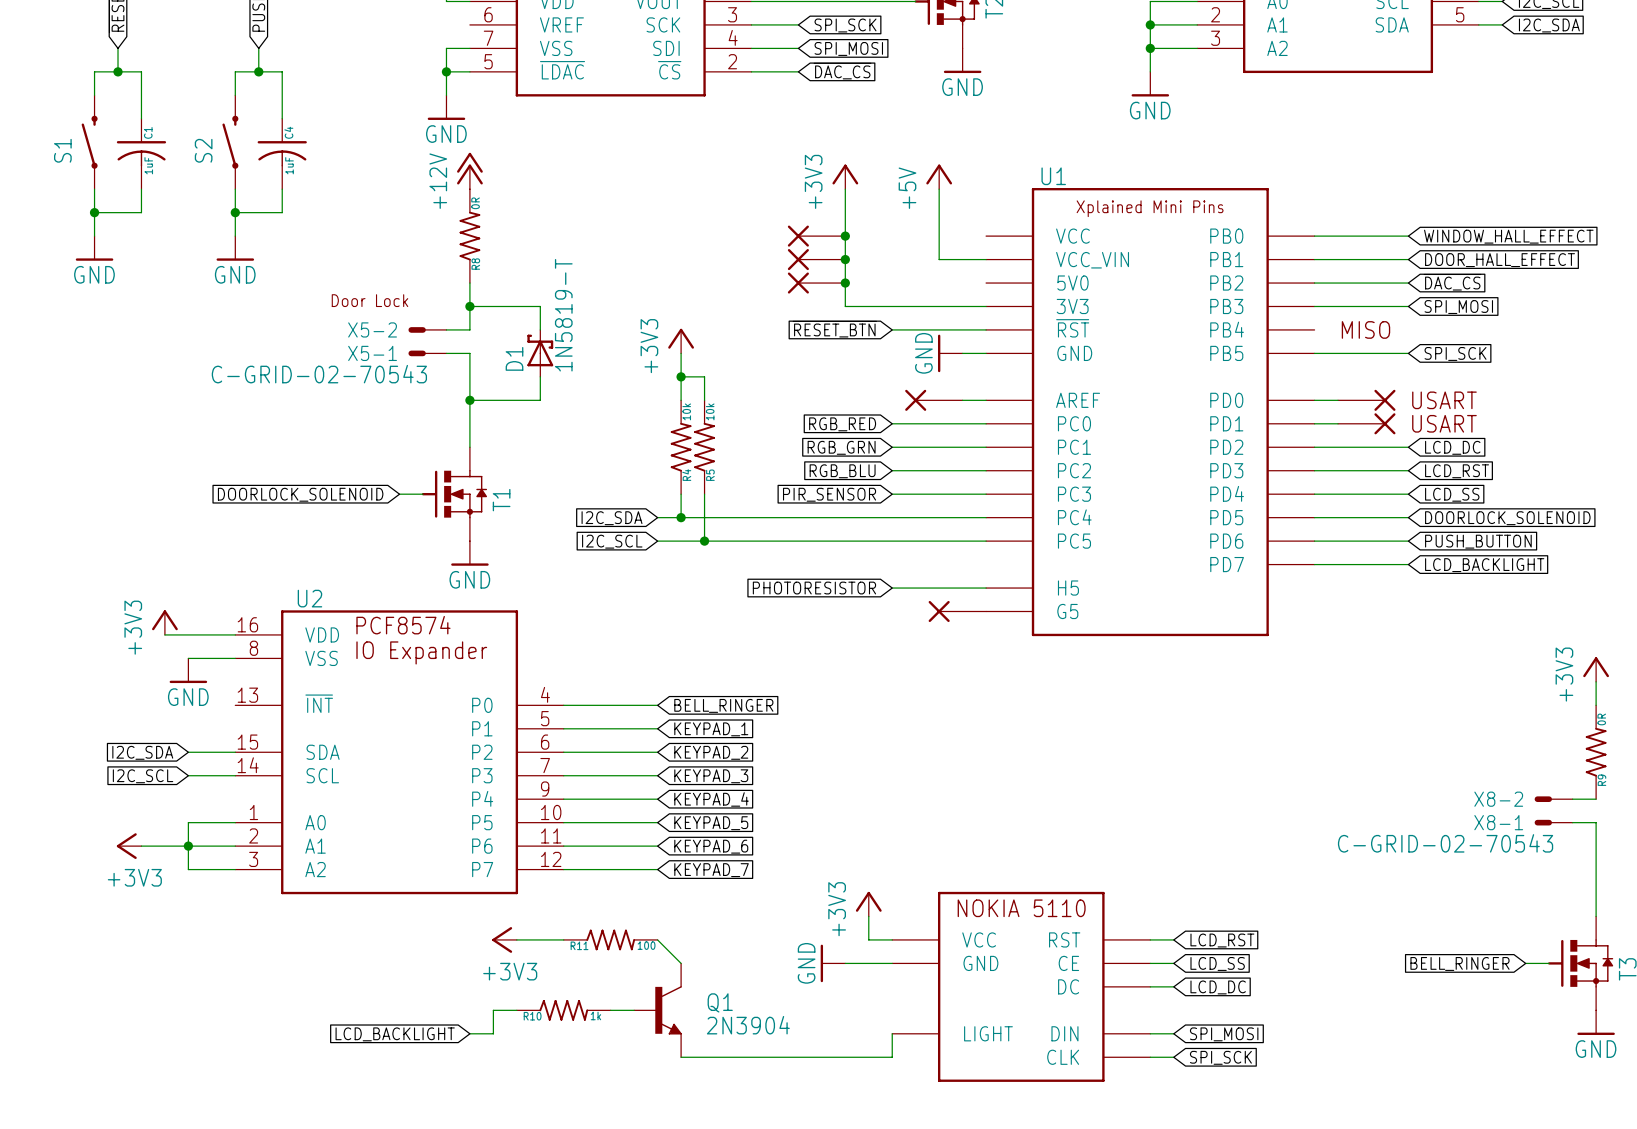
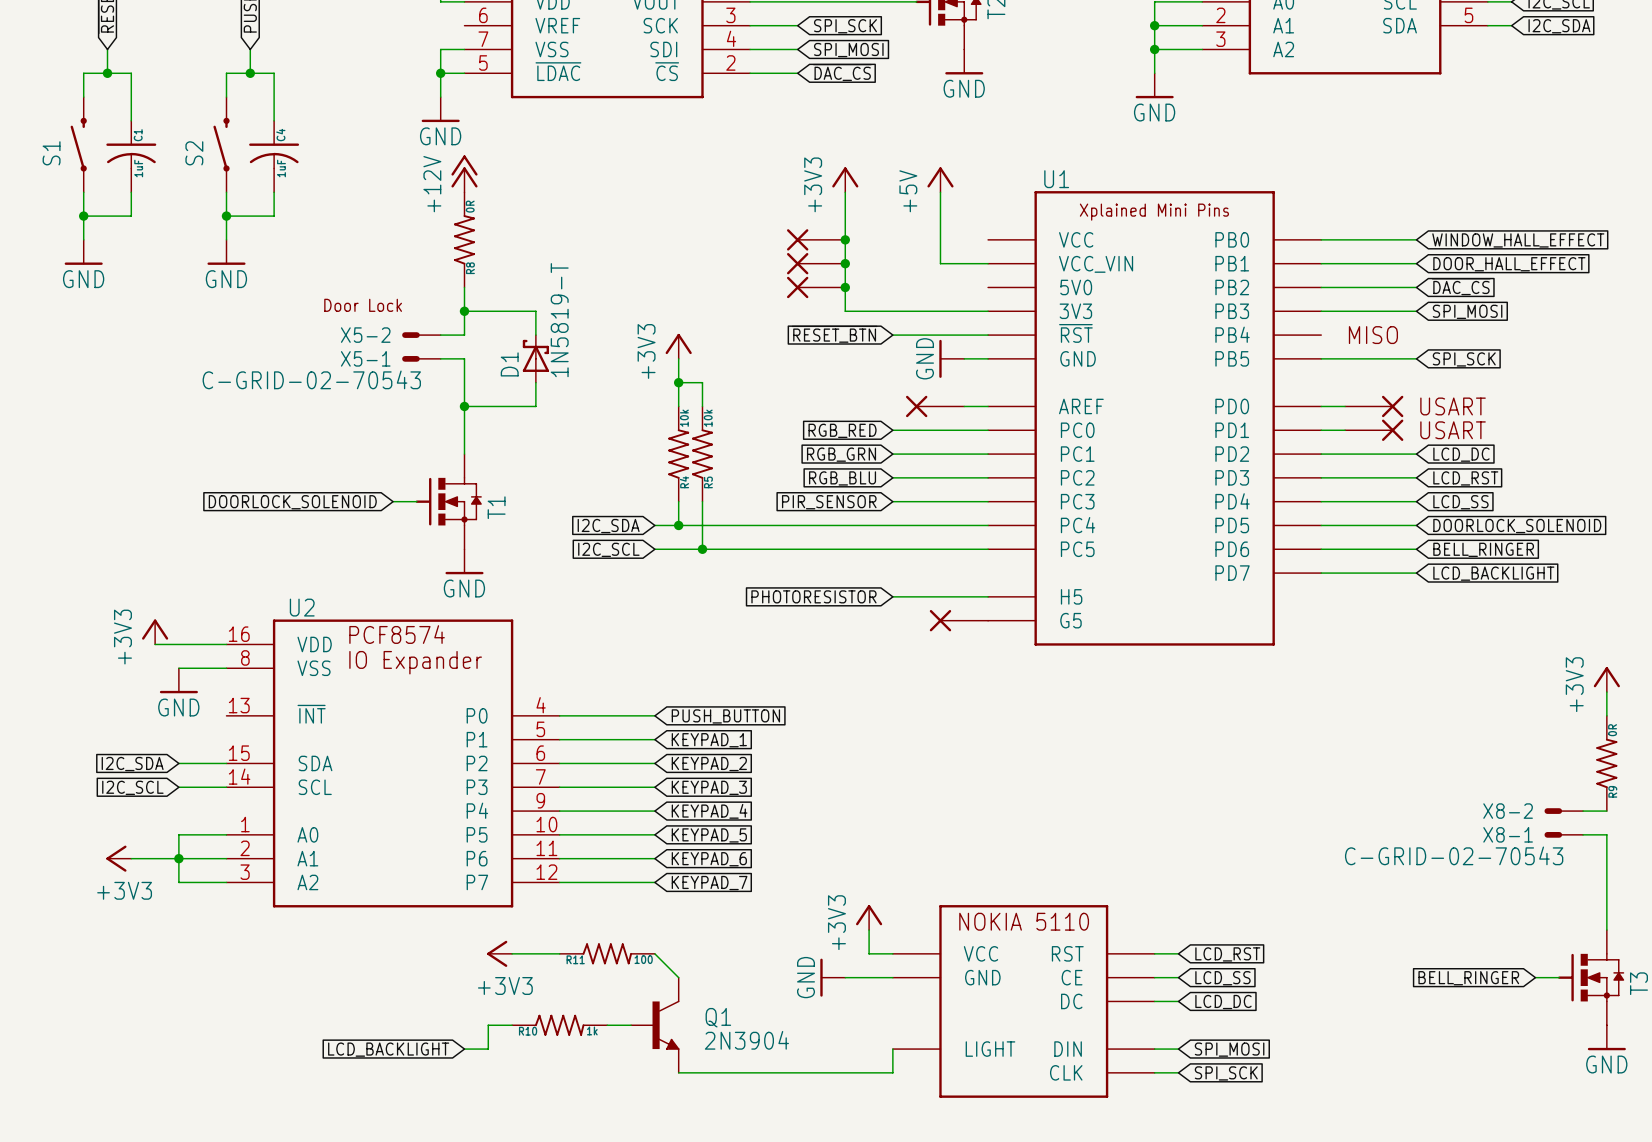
global label: PUSH_BUTTON (1478, 541) -> BELL_RINGER (1483, 549)
global label: BELL_RINGER (723, 705) -> PUSH_BUTTON (725, 716)

